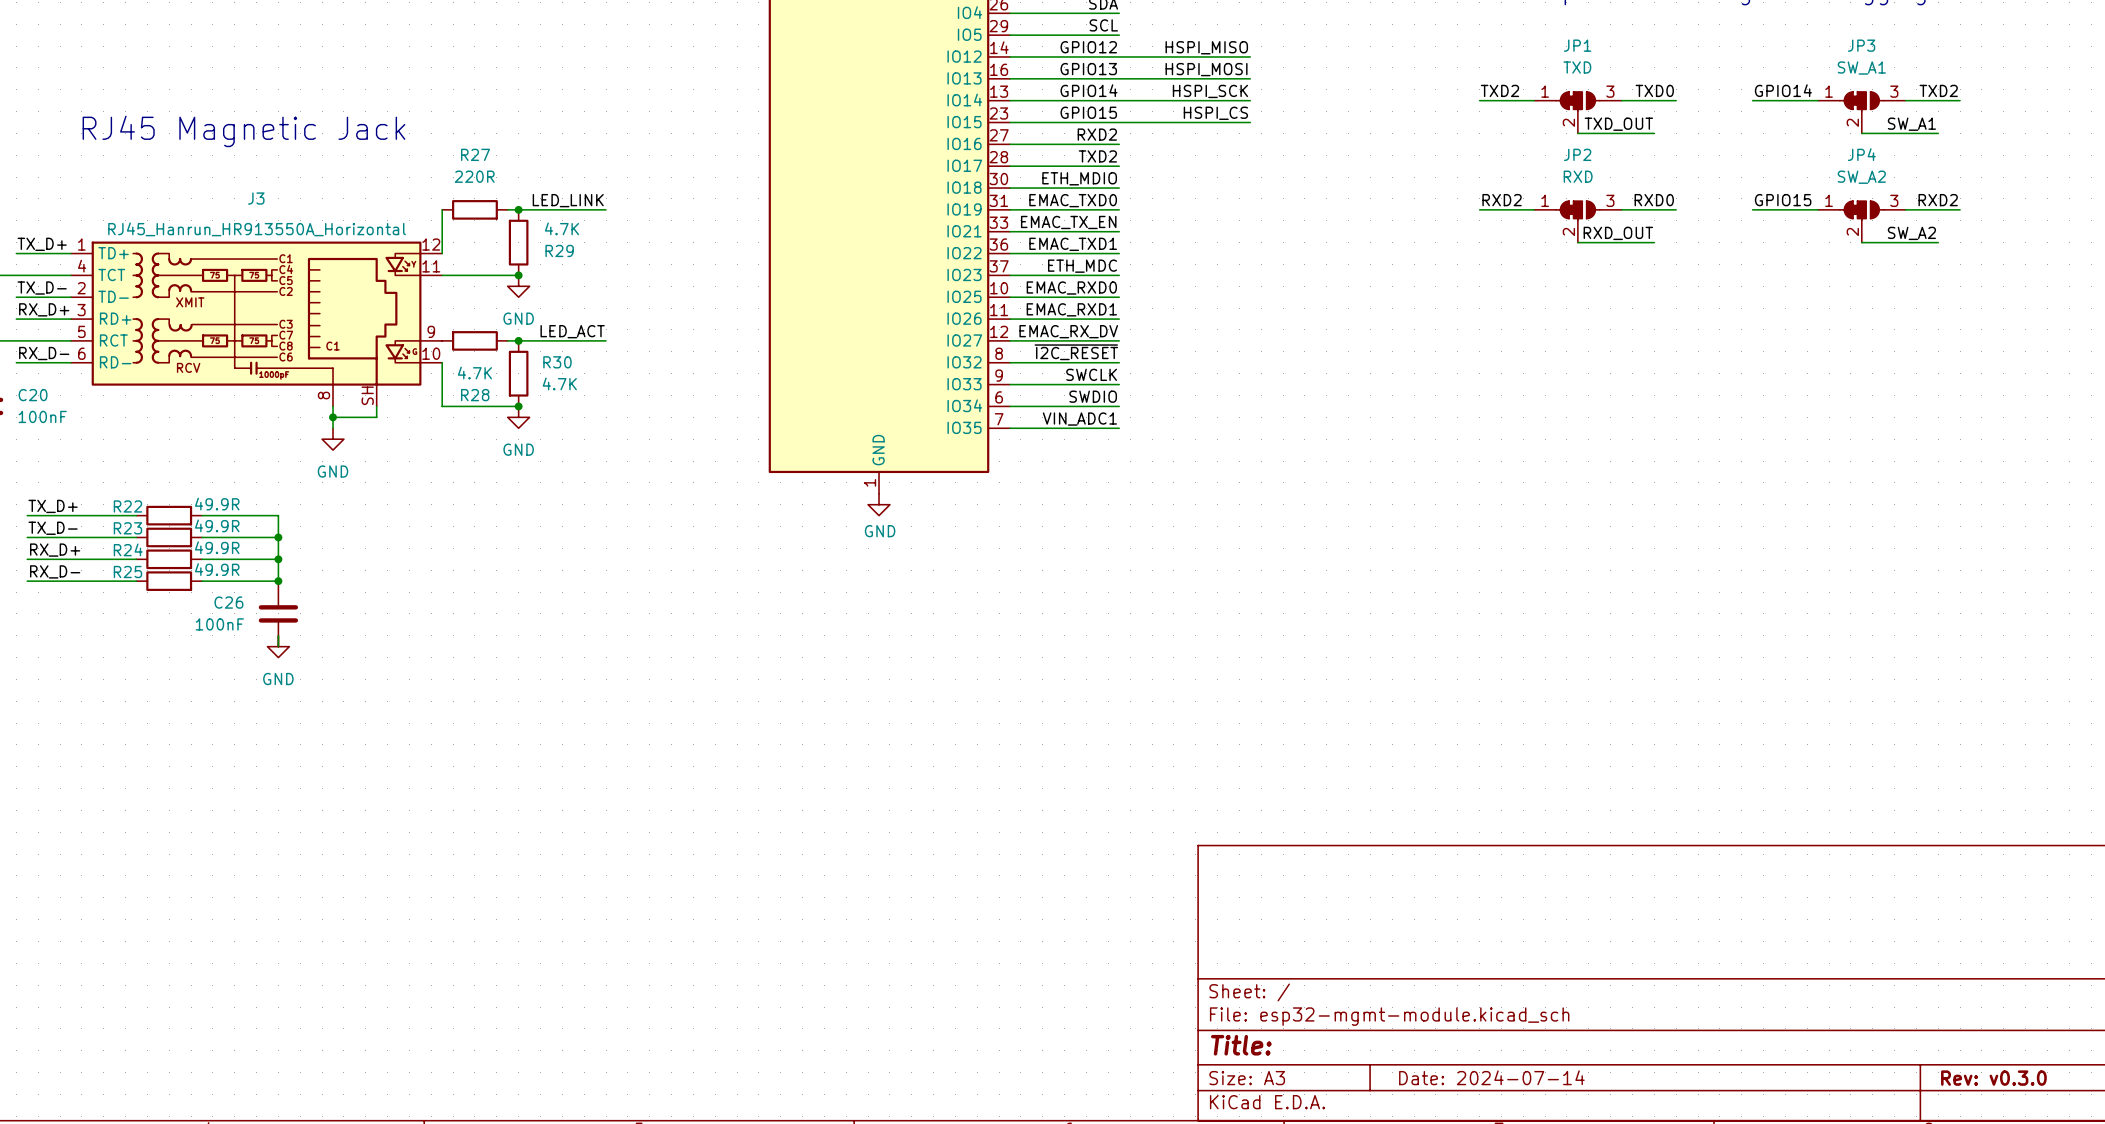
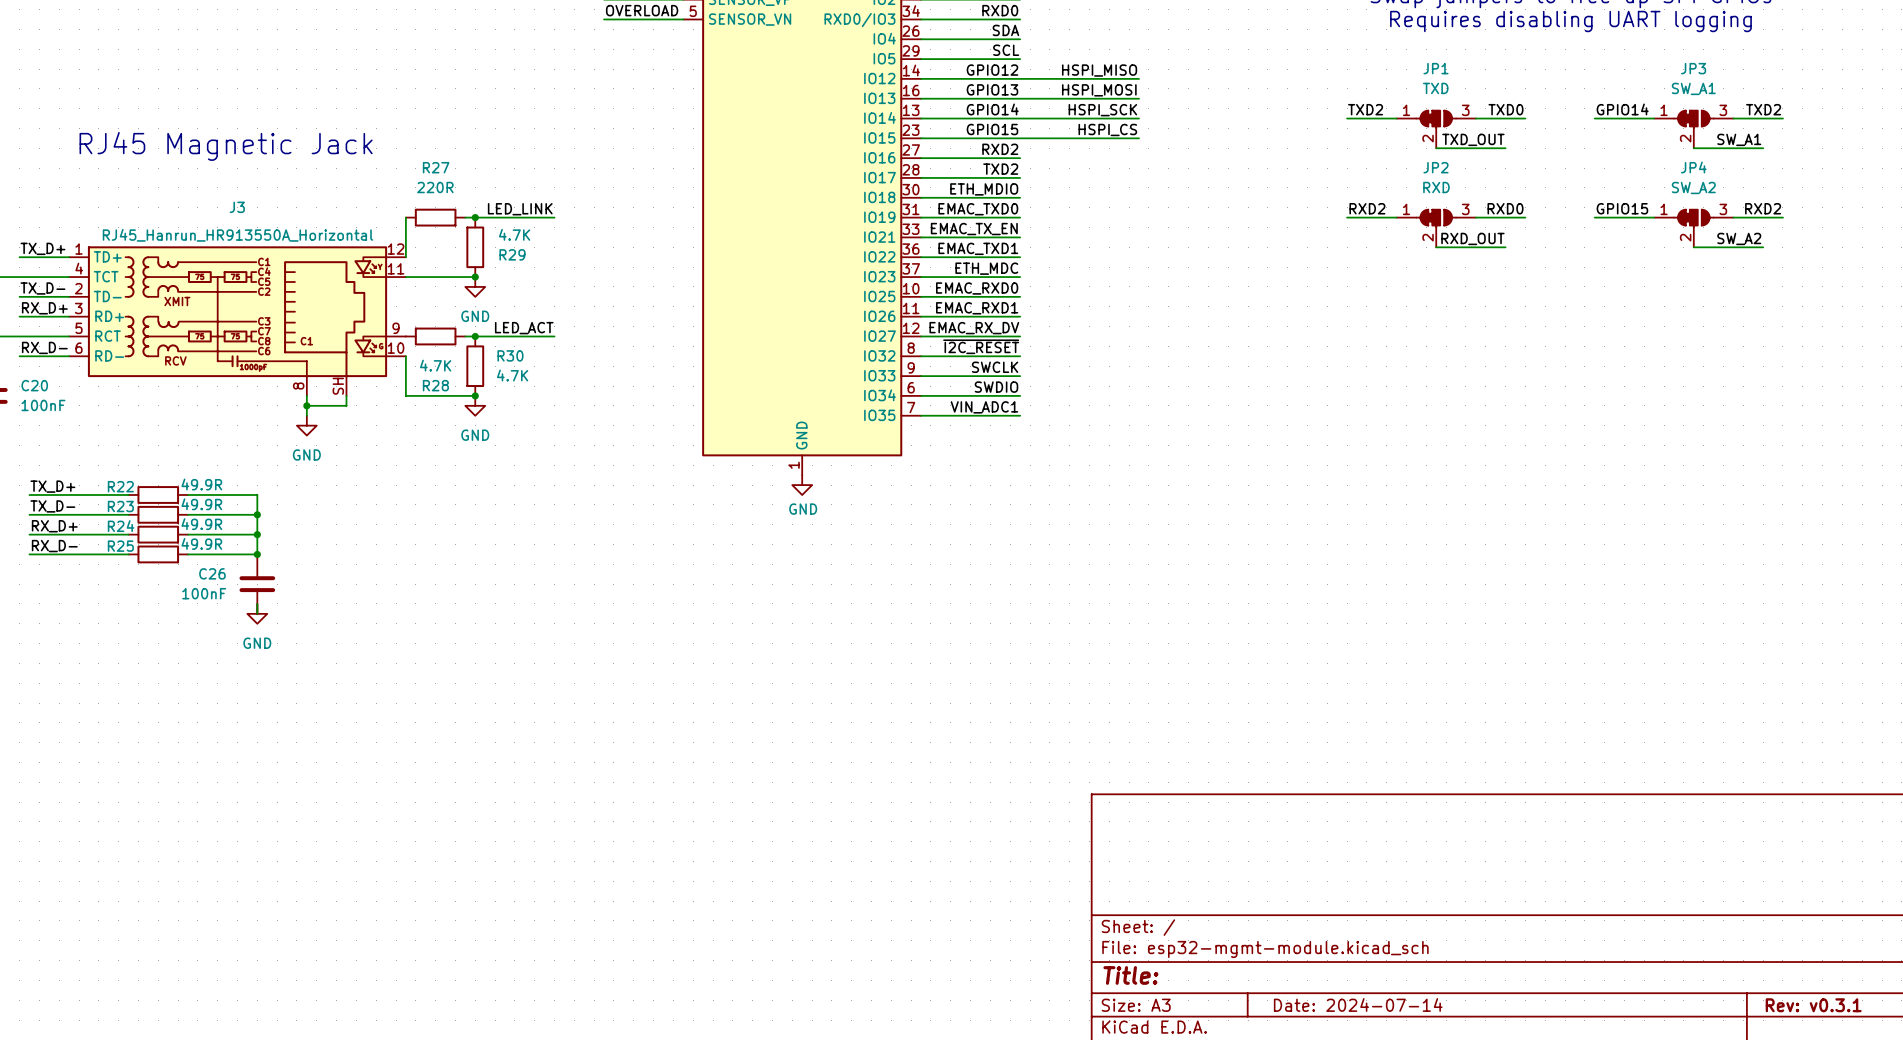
title block: Rev: v0.3.0 (1993, 1078) -> Rev: v0.3.1 (1813, 1005)

